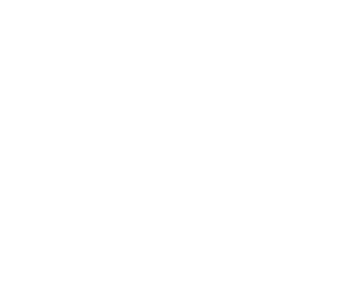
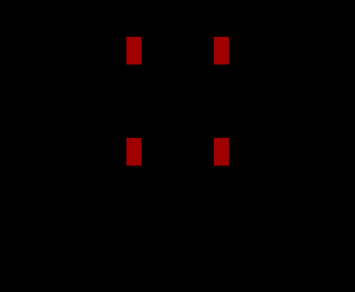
part: none -> (177, 50)
part: none -> (177, 151)

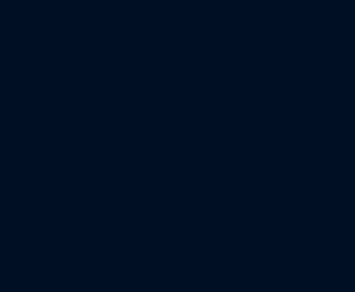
part: (177, 50) -> none
part: (177, 151) -> none

